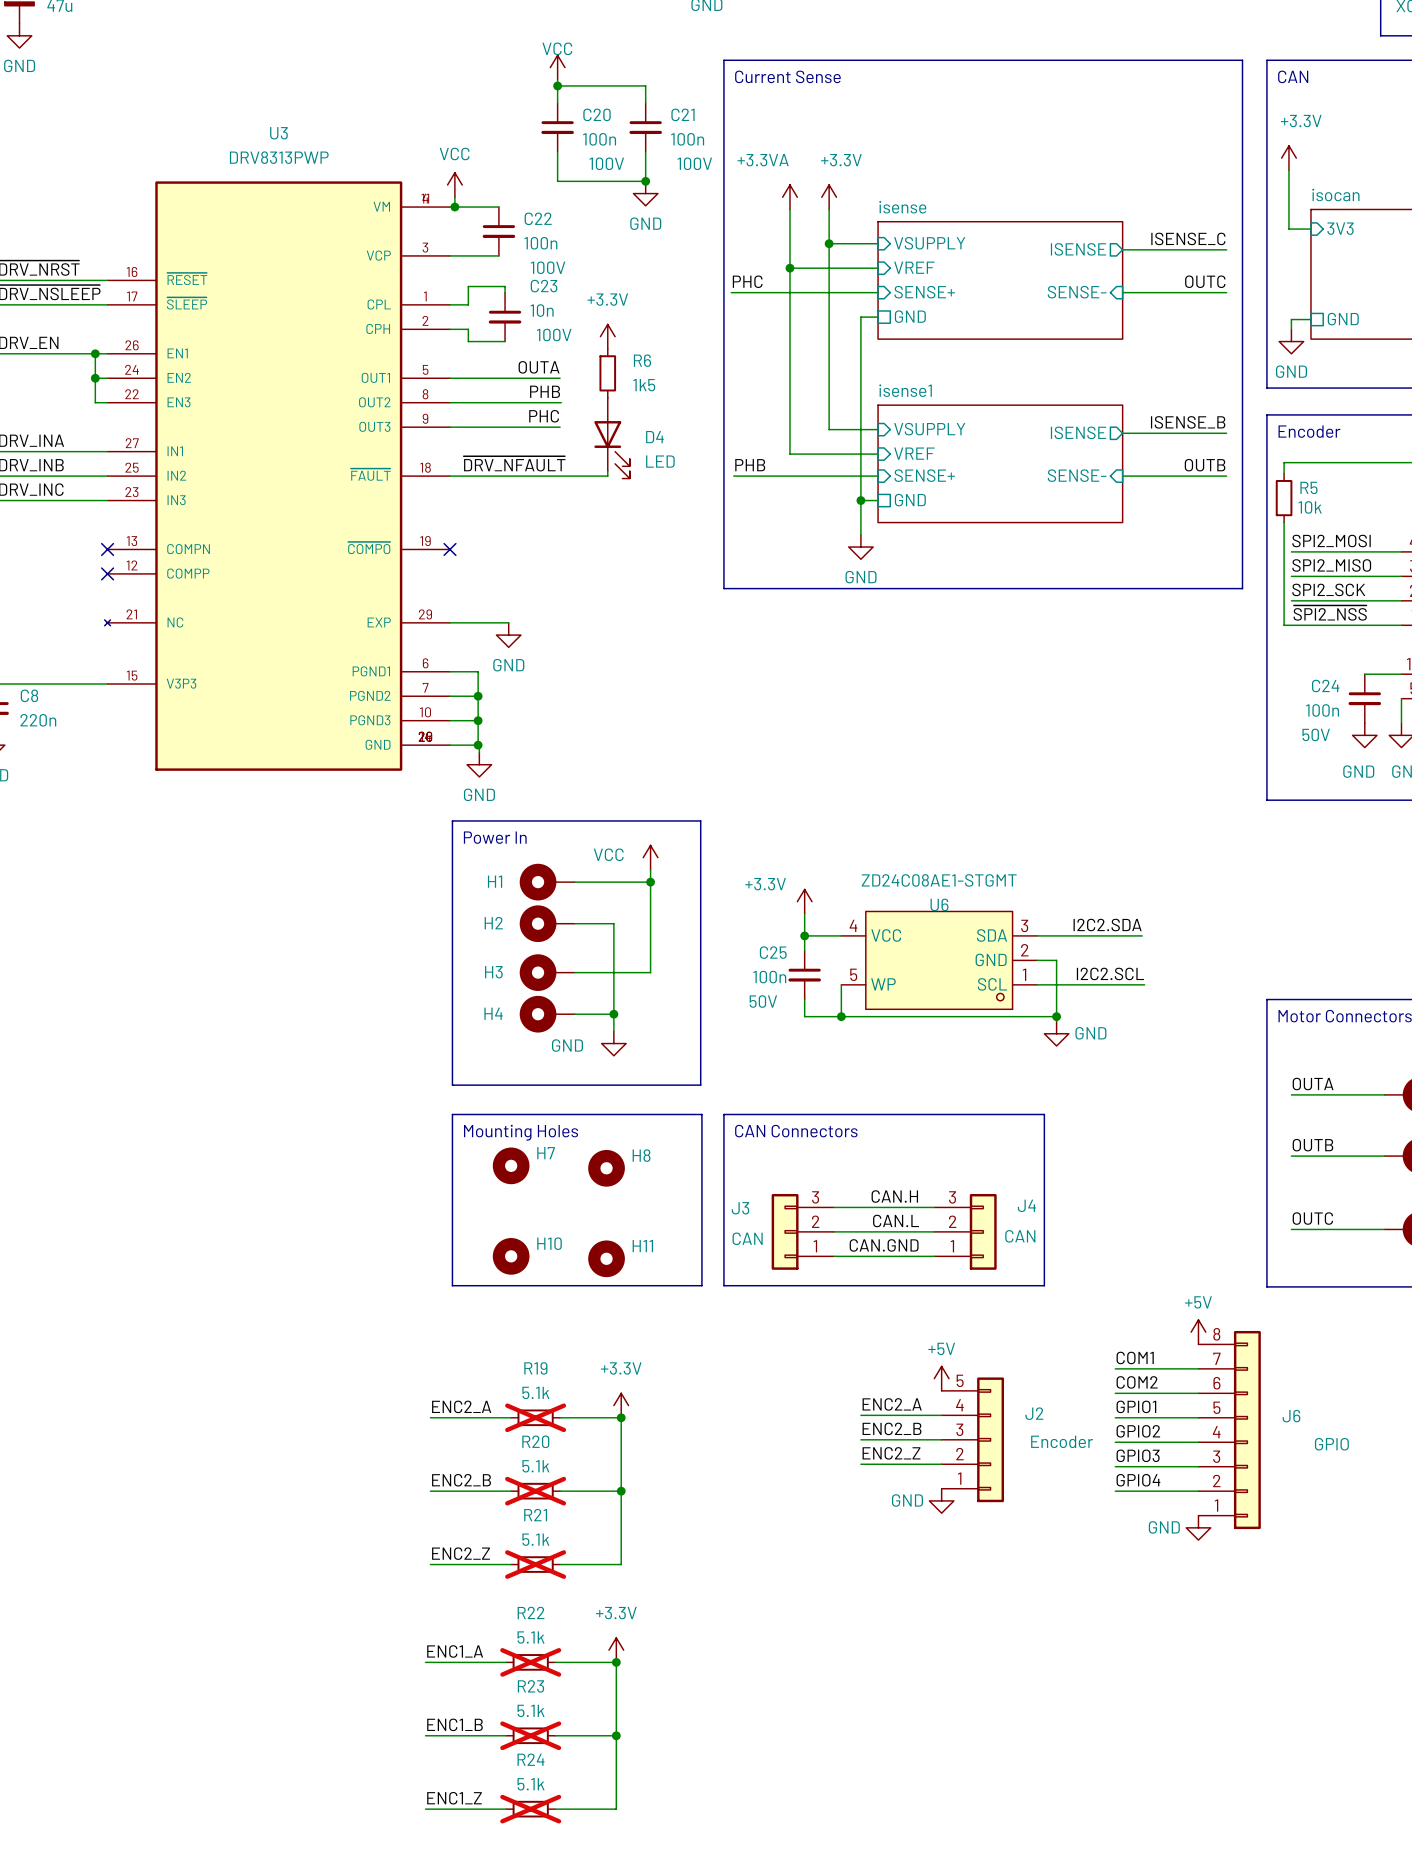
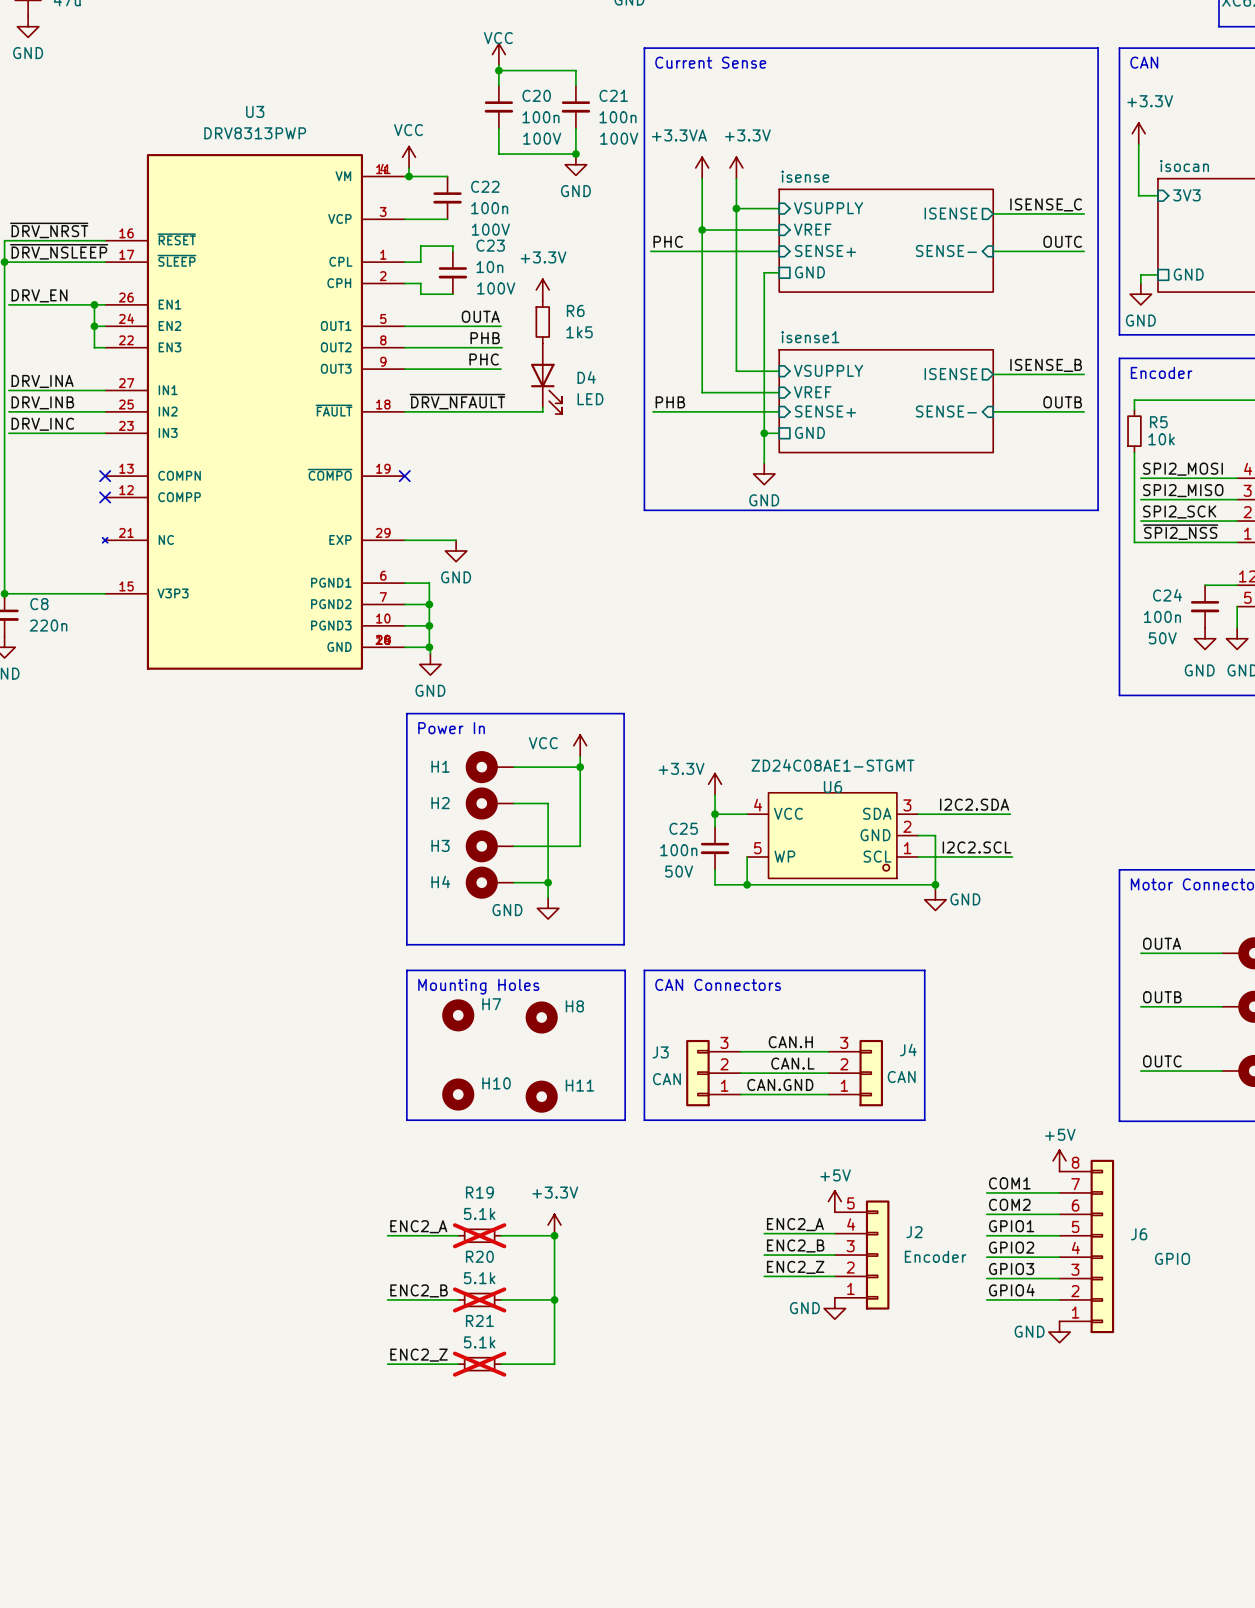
power symbol: +3.3V (616, 1650) -> none
label: ENC1_A (455, 1651) -> none
wire: (425, 1662) (506, 1662) -> none
R22: 5.1k (530, 1662) -> none
wire: (555, 1662) (616, 1662) (616, 1809) (555, 1809) -> none
junction: (616, 1662) -> none
label: ENC1_B (454, 1724) -> none
wire: (425, 1735) (506, 1735) -> none
R23: 5.1k (530, 1735) -> none
wire: (555, 1735) (616, 1735) -> none
junction: (616, 1735) -> none
label: ENC1_Z (454, 1798) -> none
wire: (425, 1809) (506, 1809) -> none
R24: 5.1k (530, 1809) -> none

